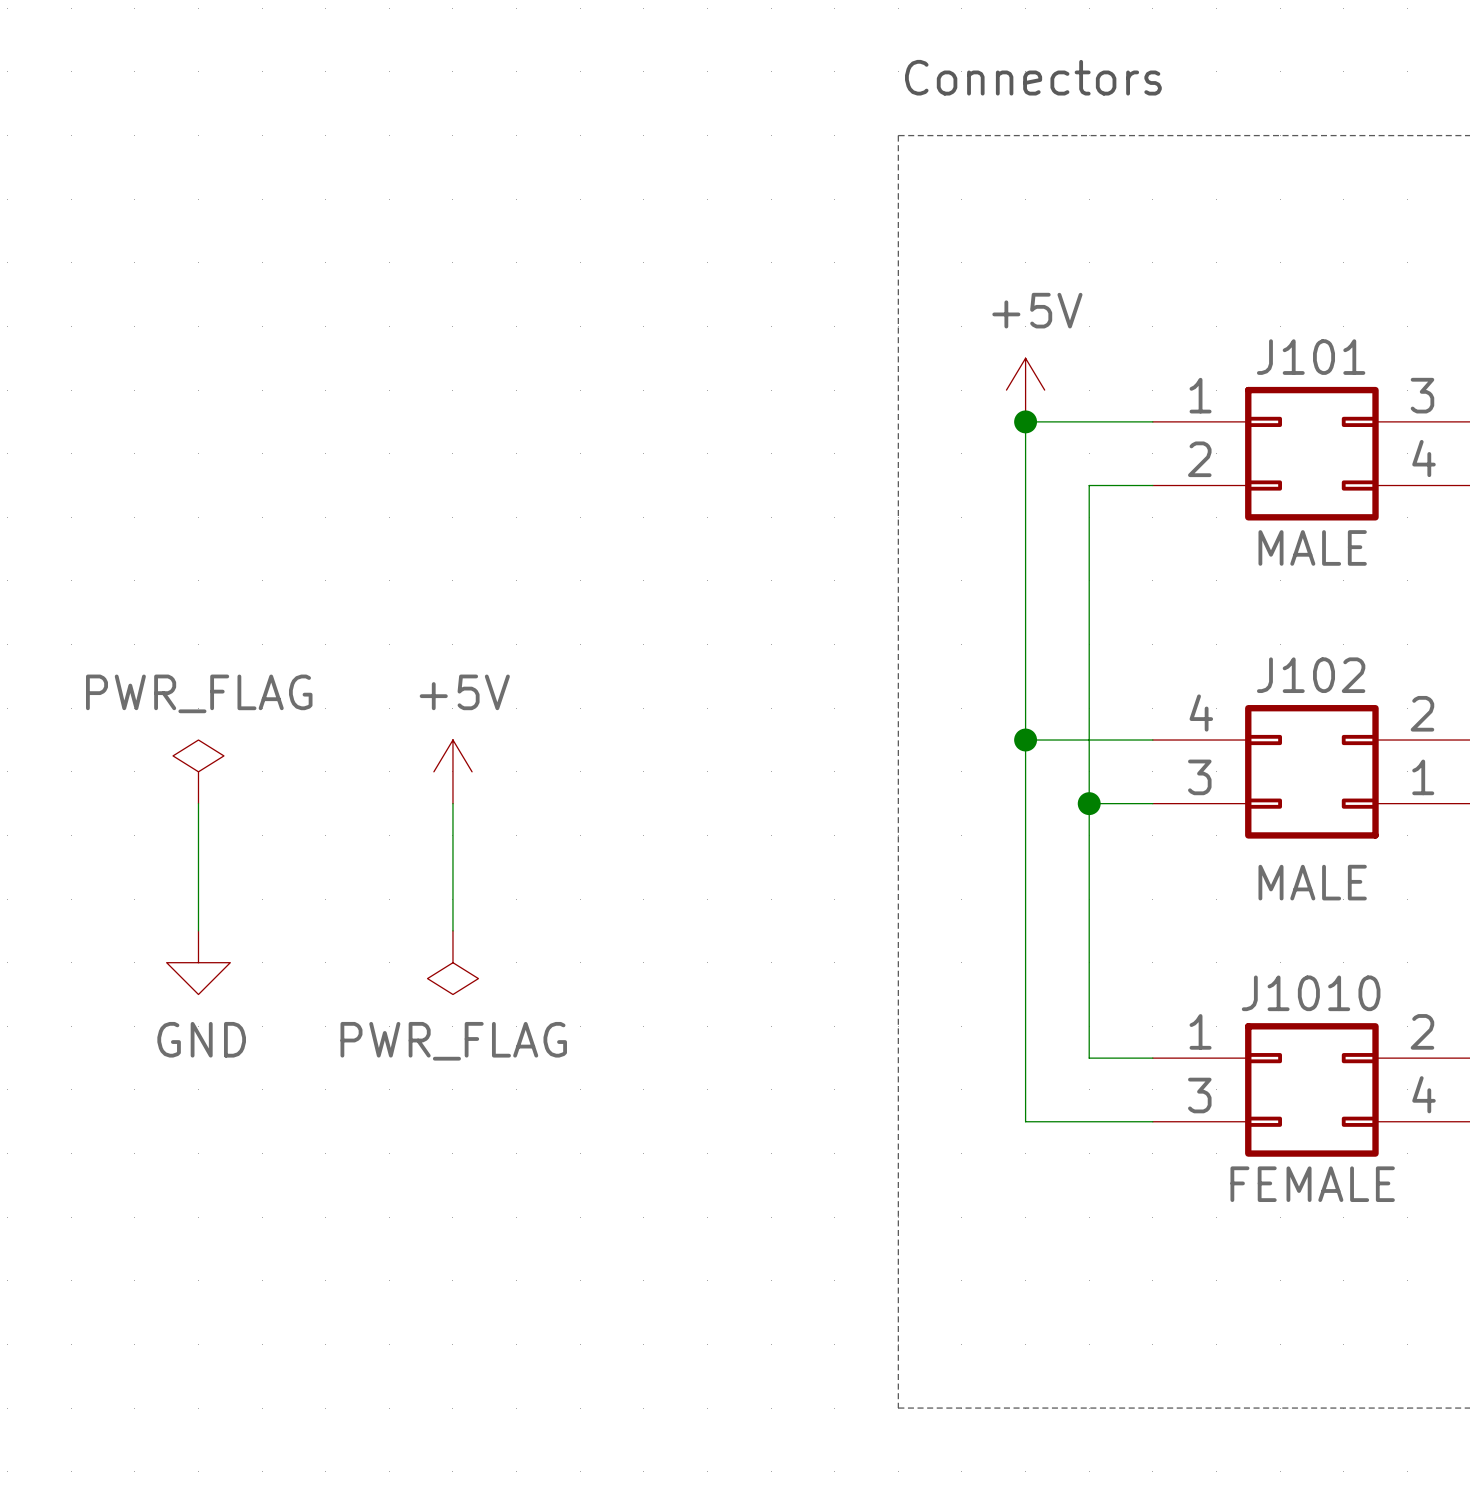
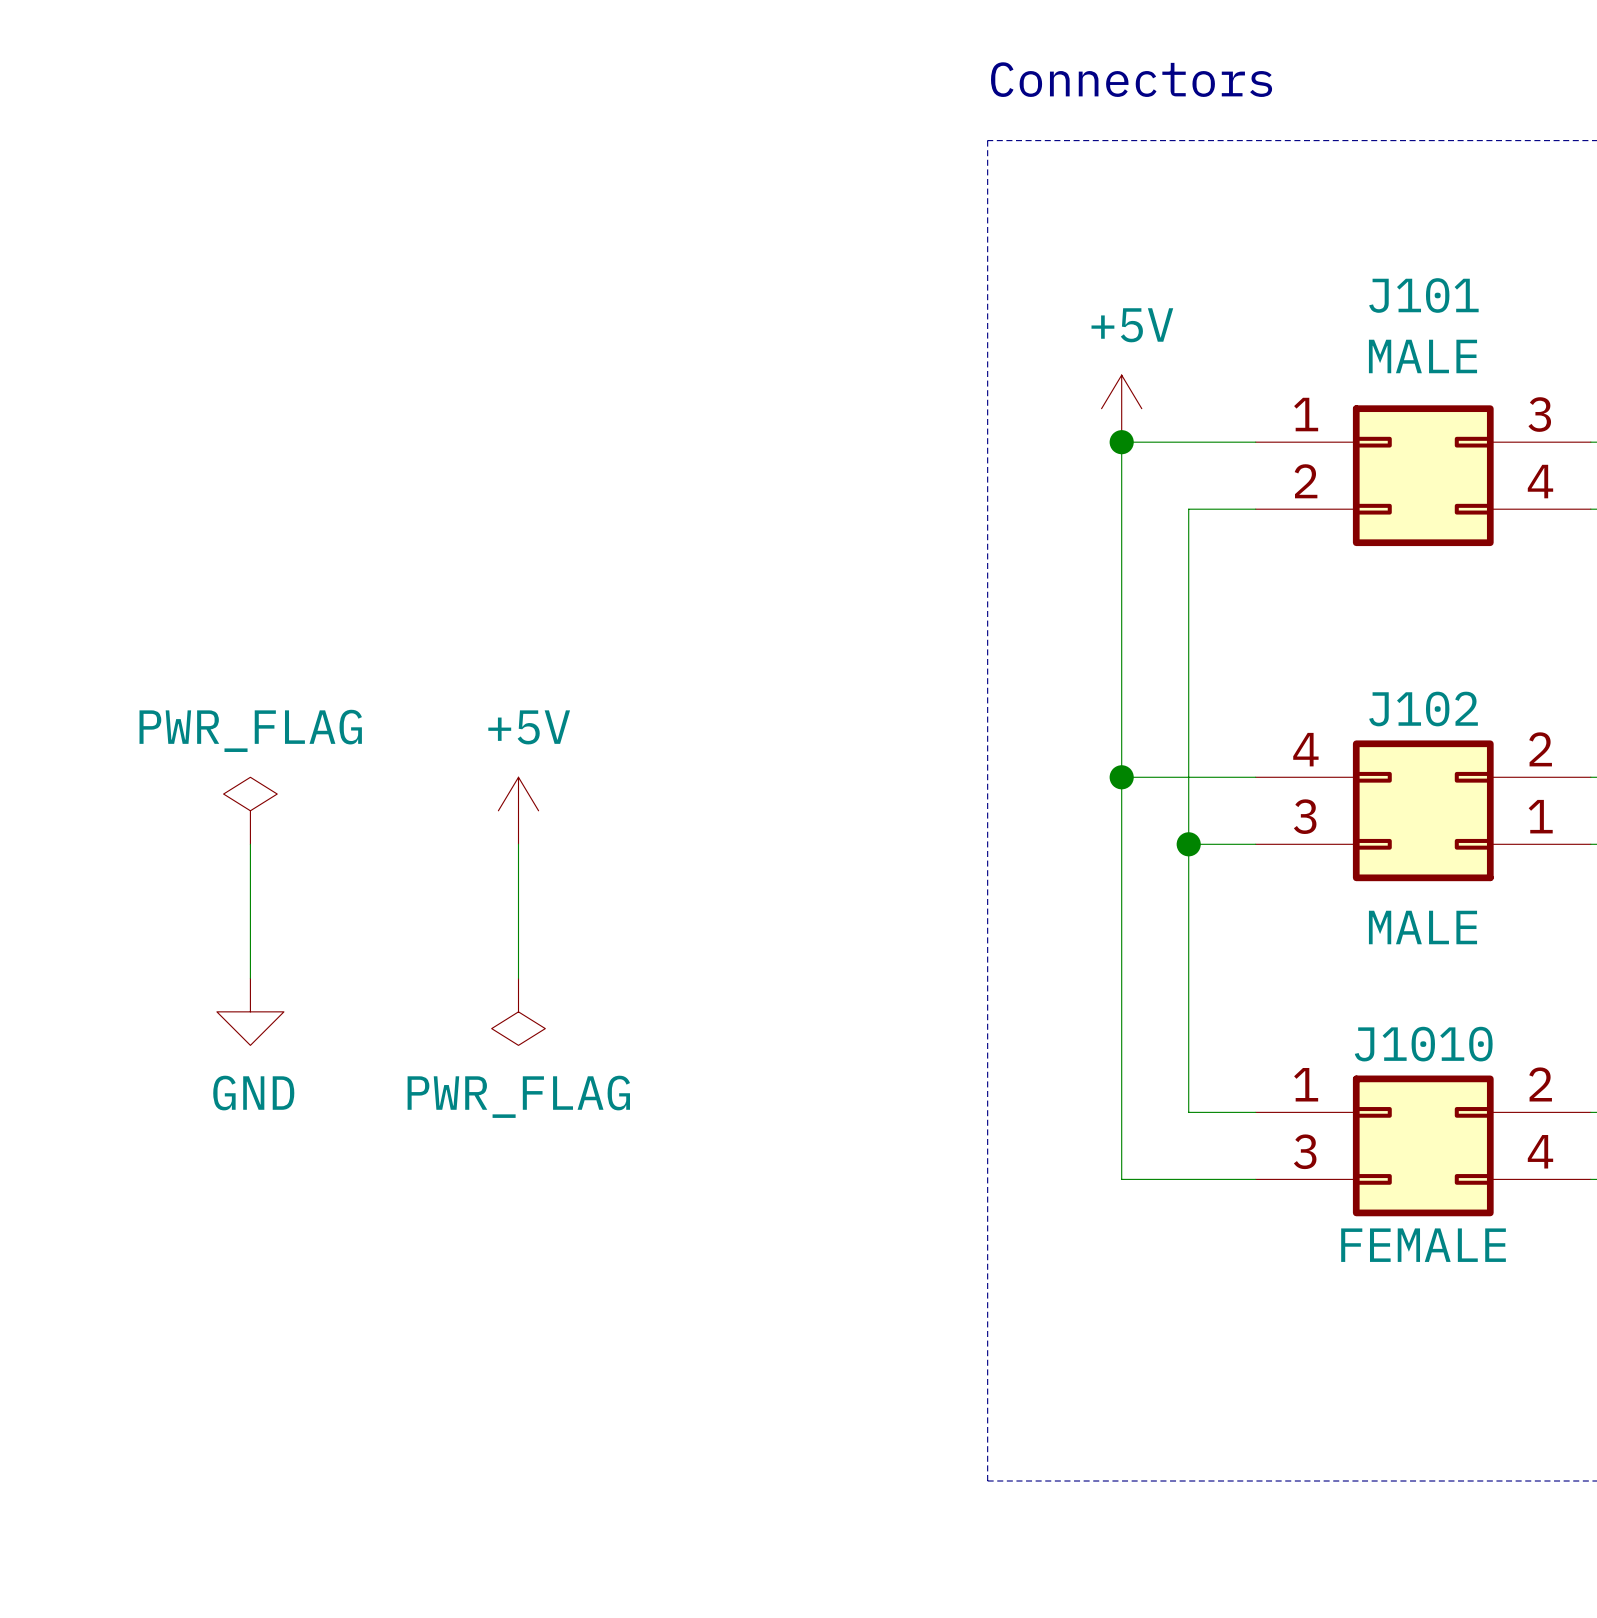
J101 name position: J101 (1311, 357) -> J101 (1423, 295)
J101 value position: MALE (1312, 547) -> MALE (1422, 356)

